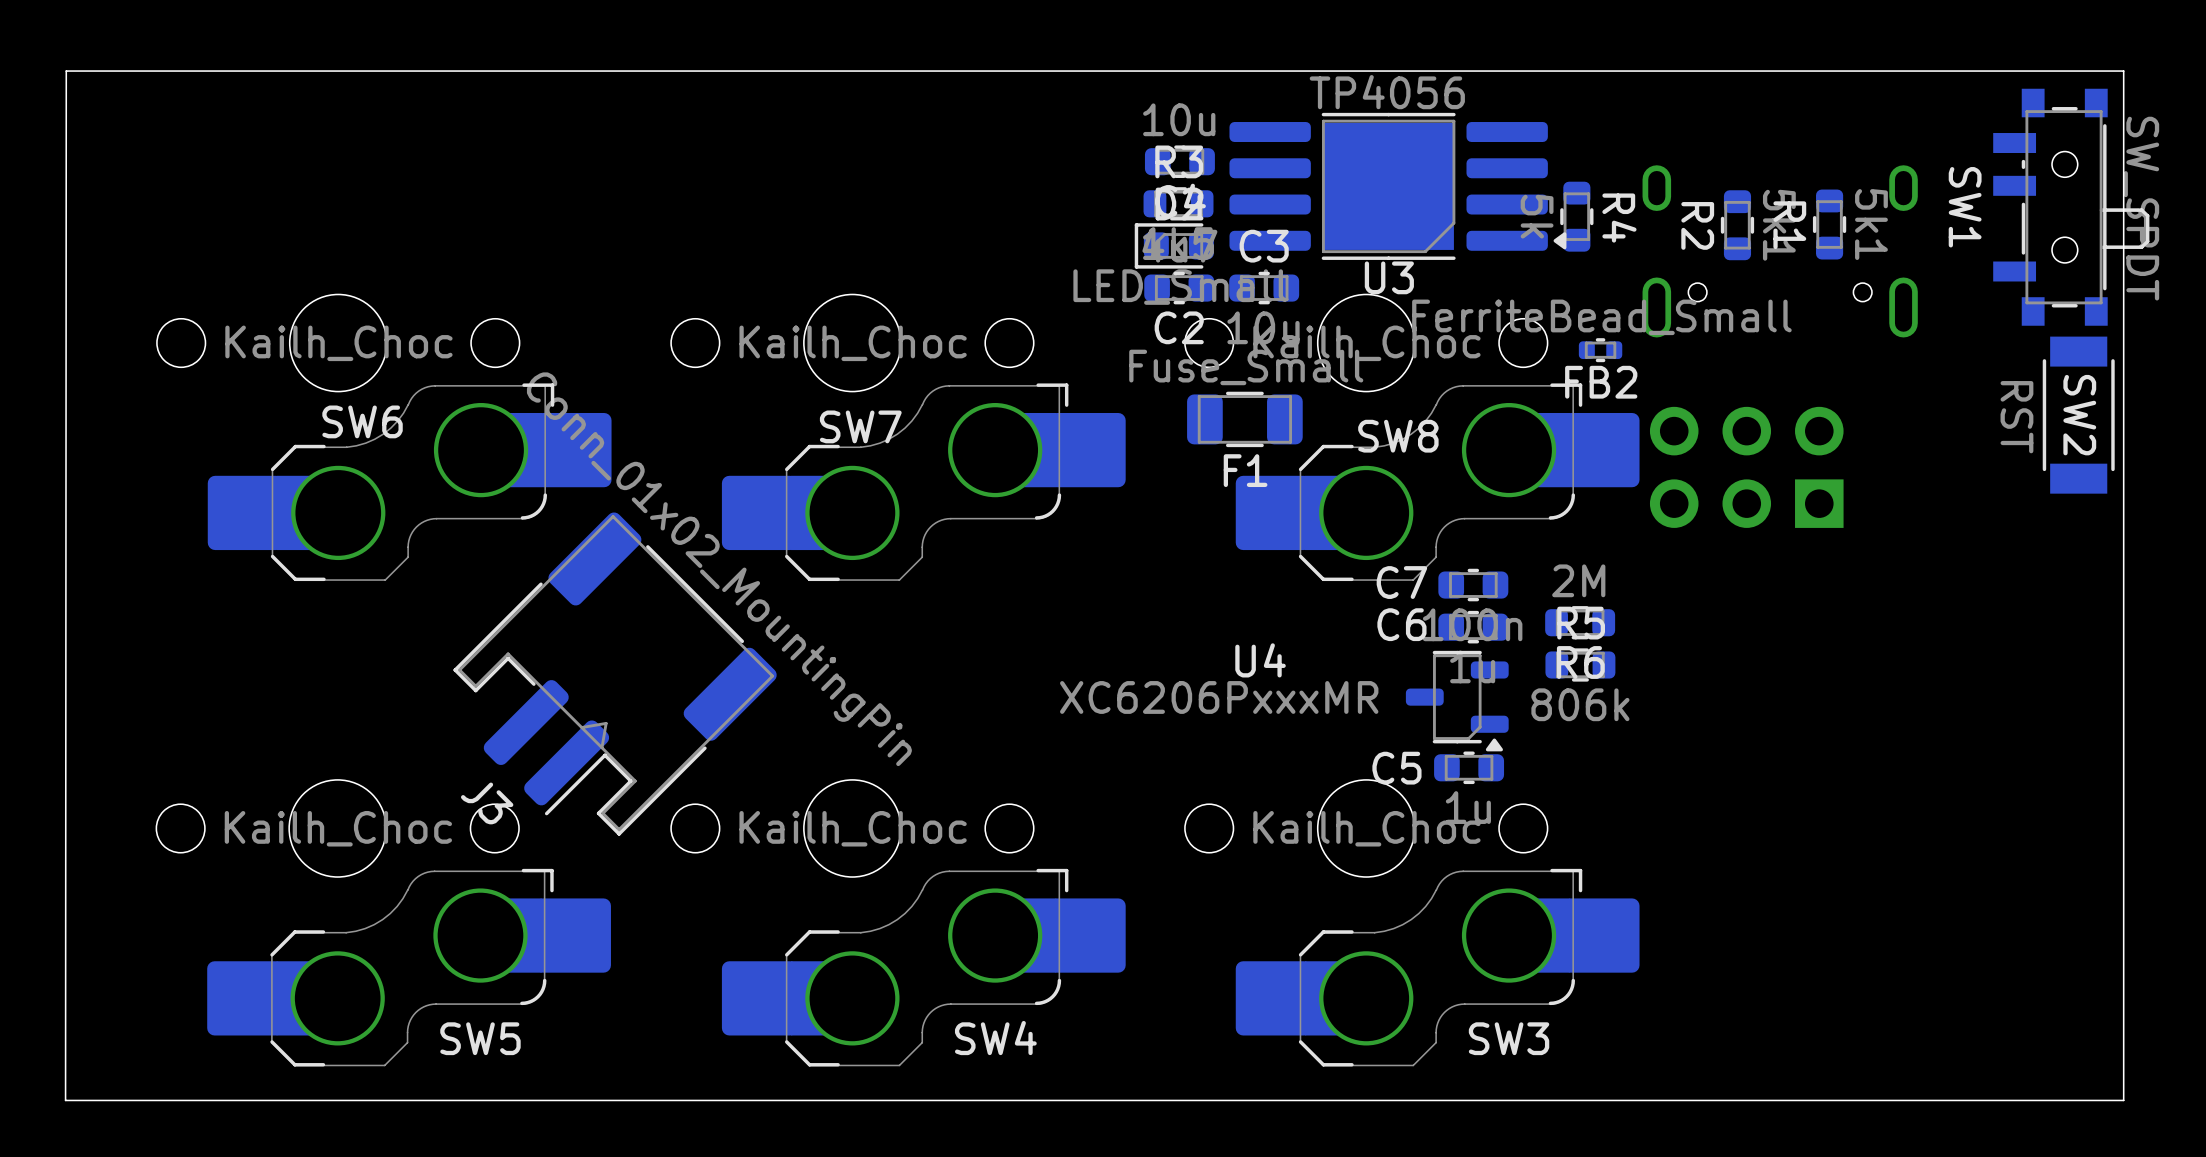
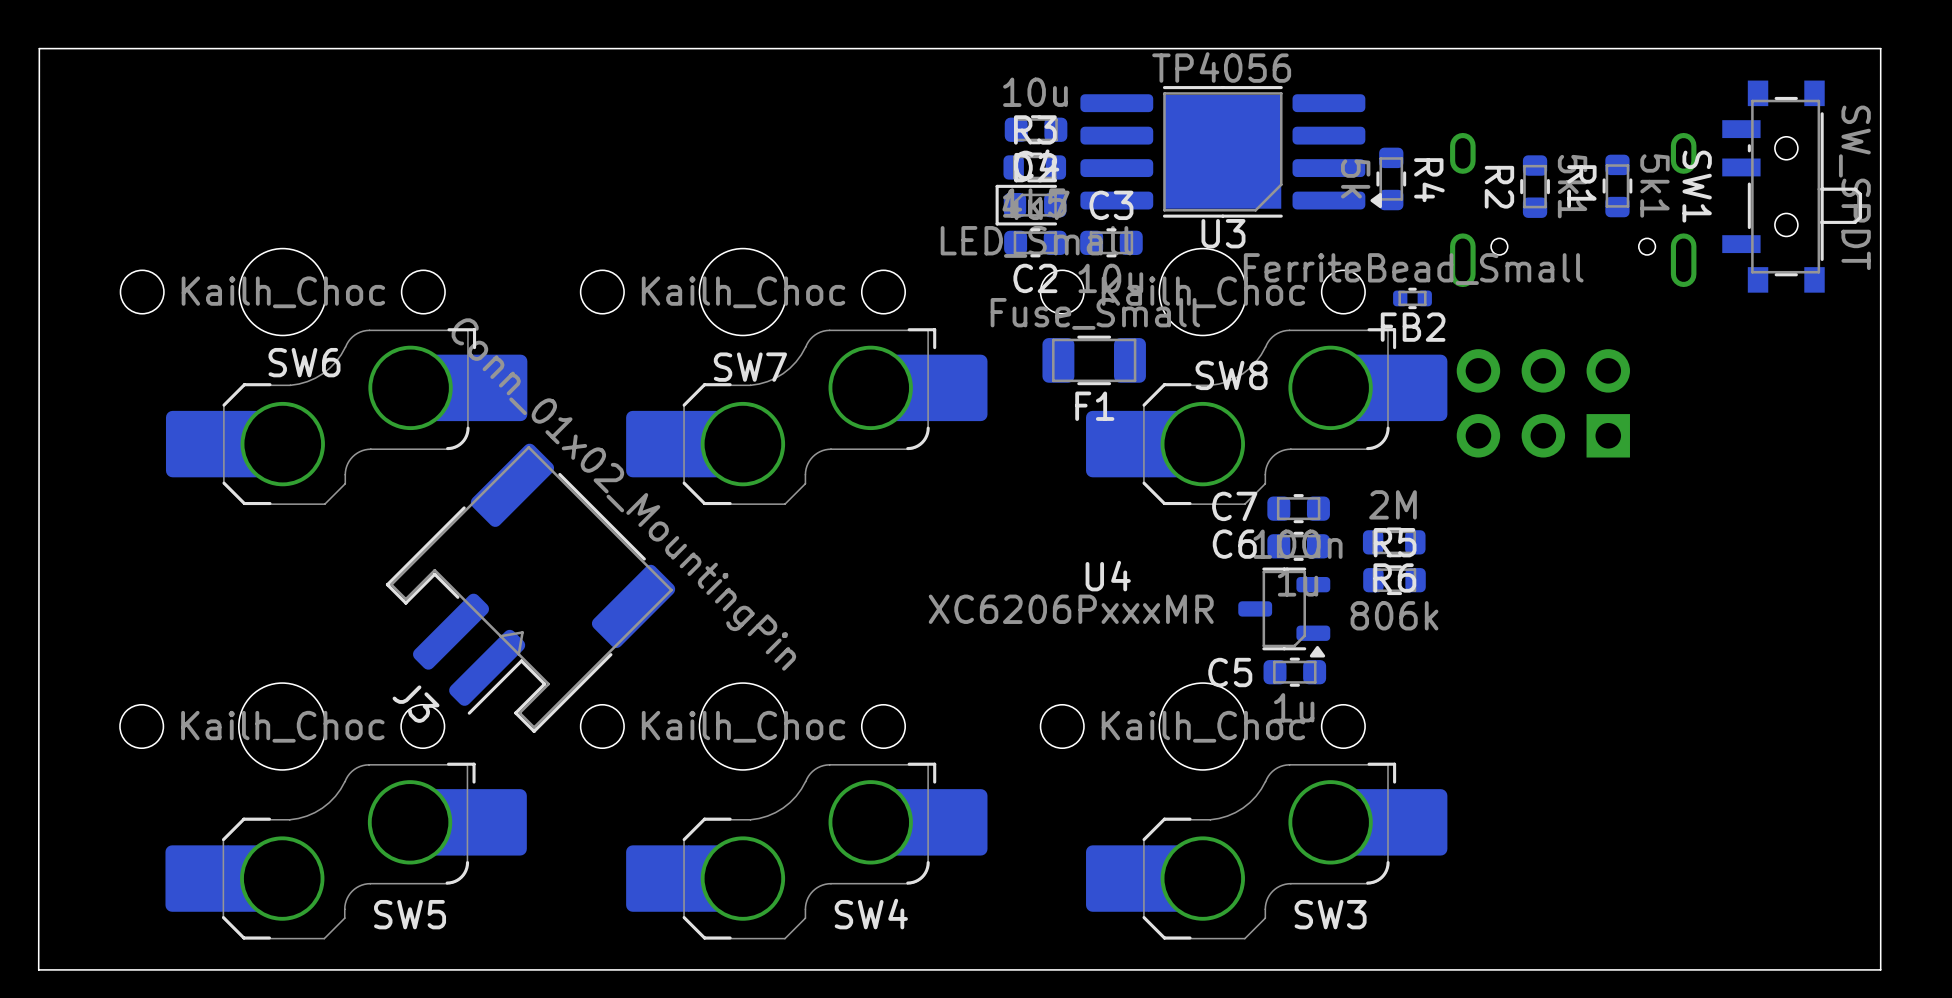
SW1 position: (2071, 207) -> (1792, 186)
SW2: RST (2078, 415) -> none

